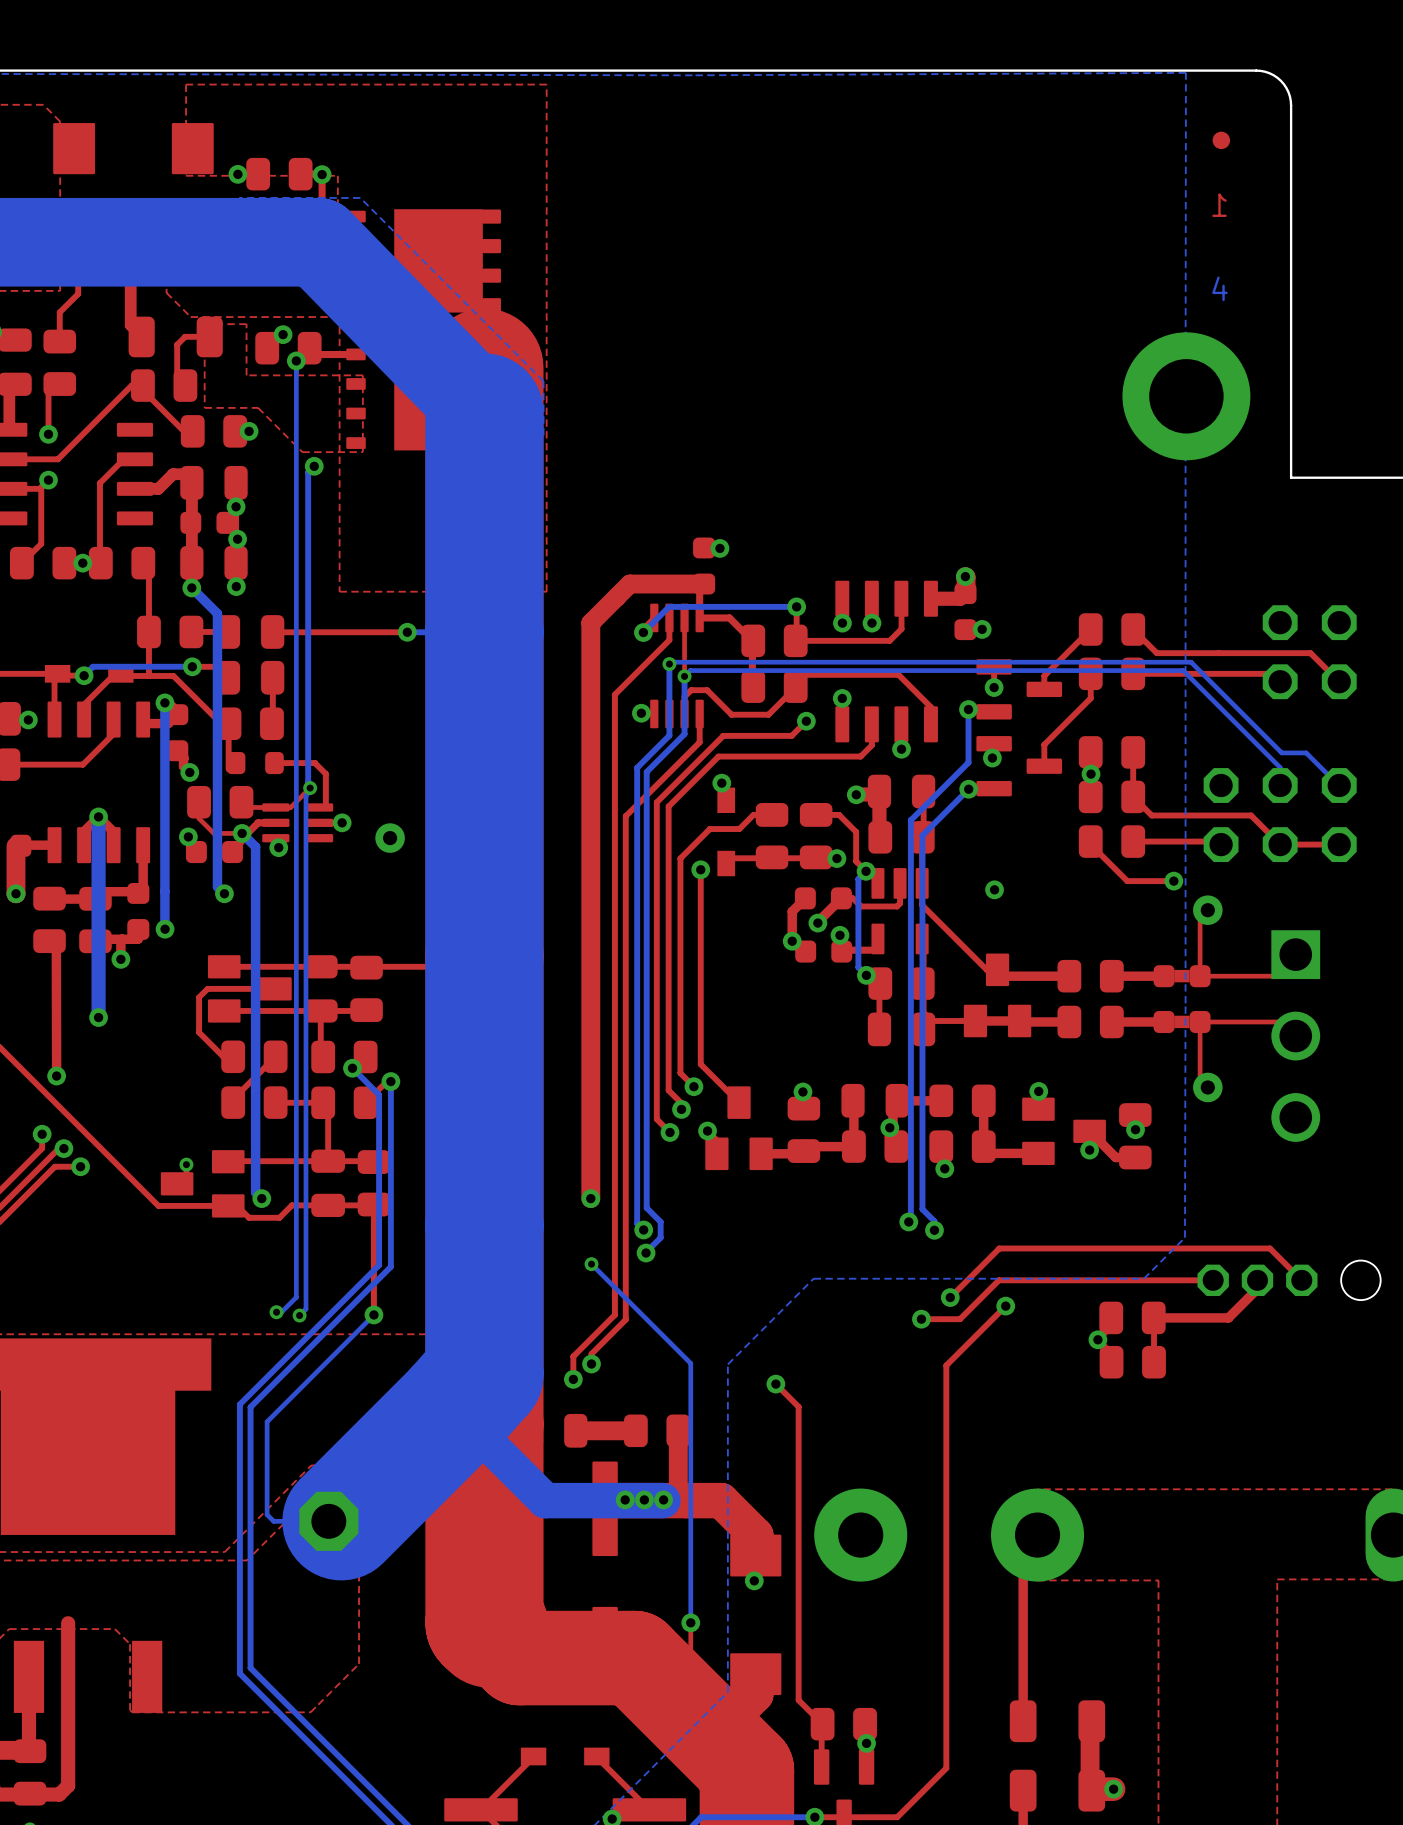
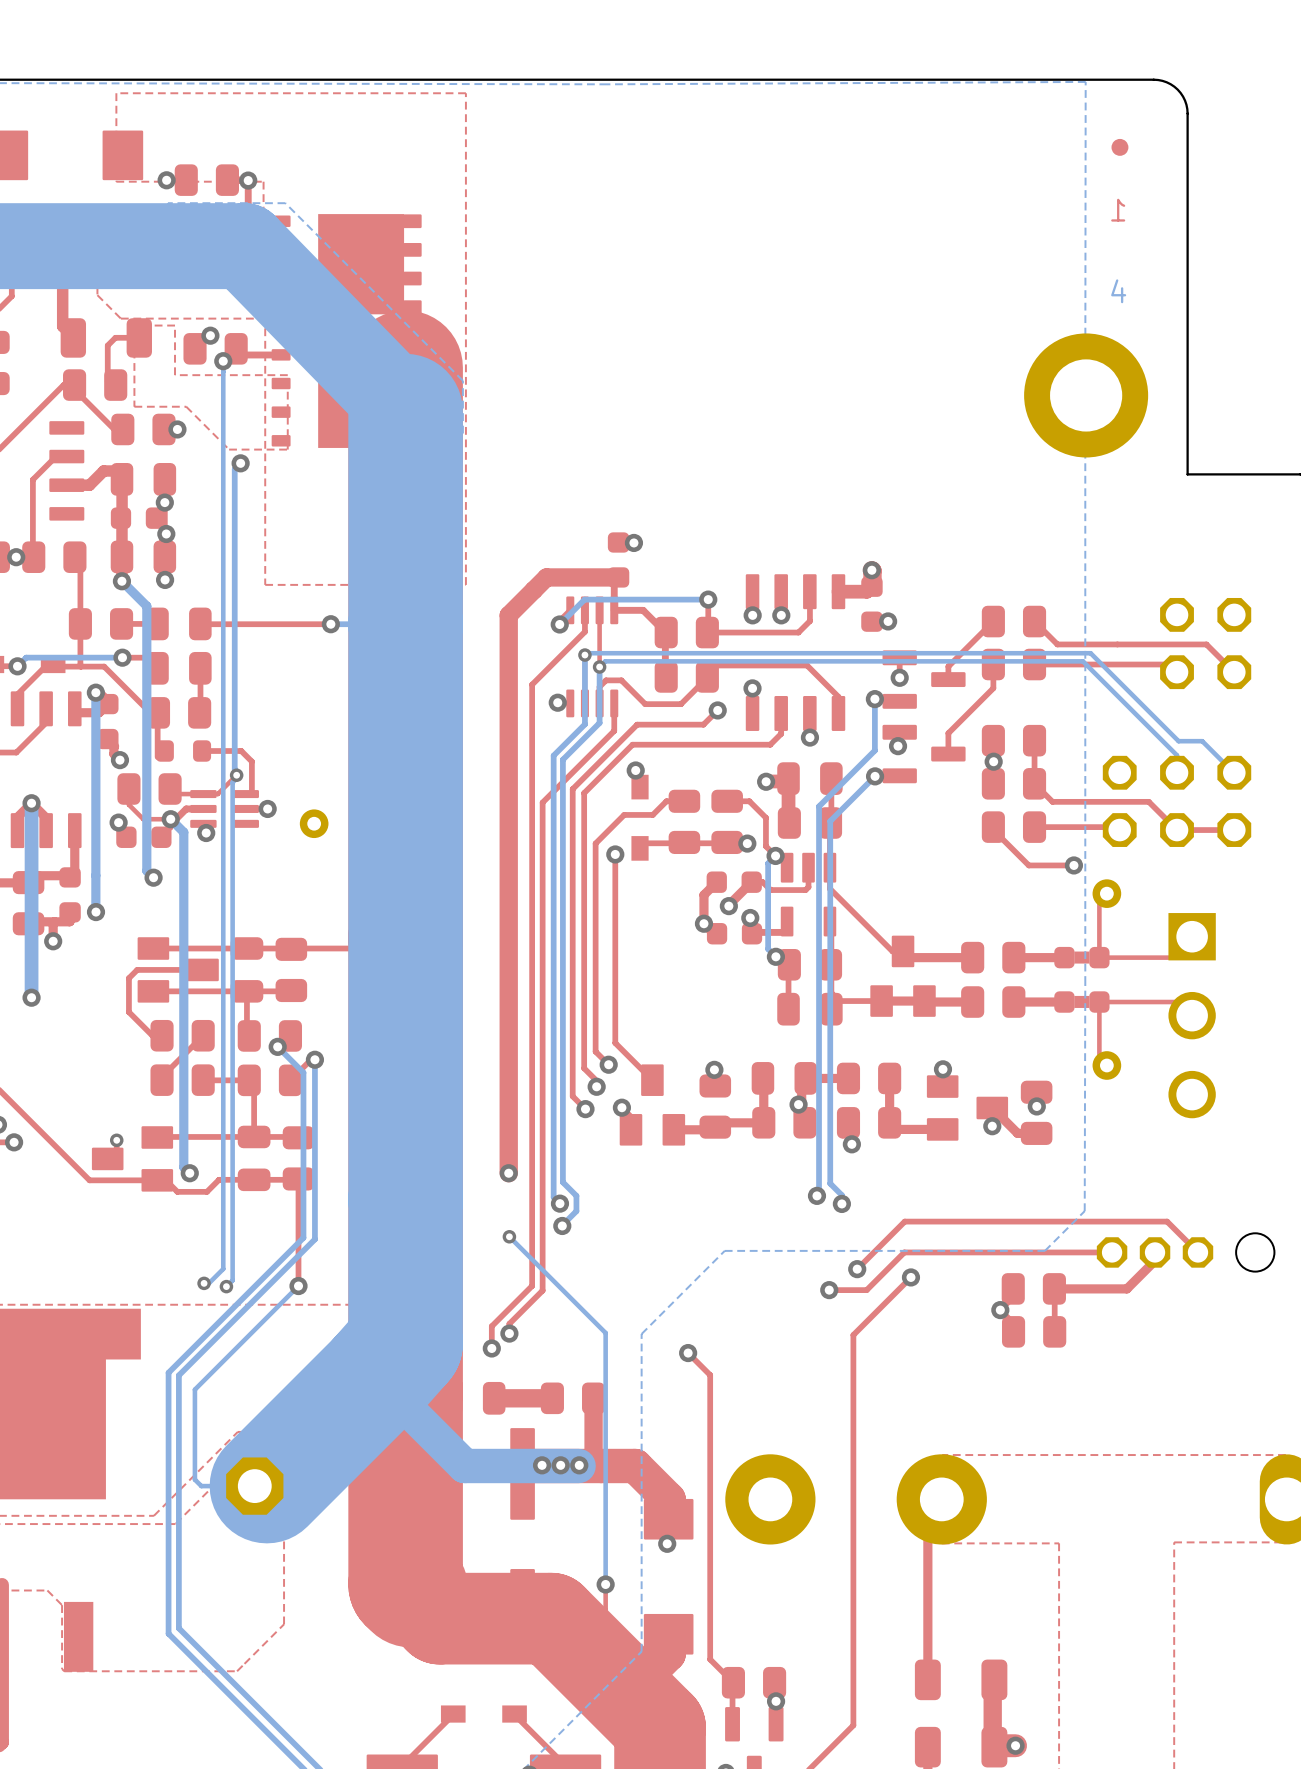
via: (994, 889) -> none

